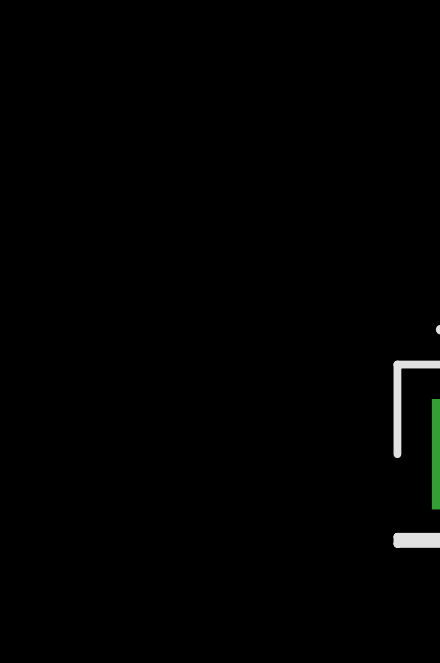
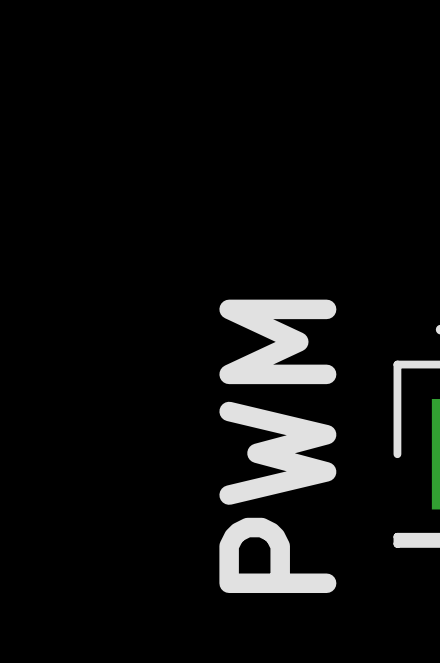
text: none -> PWM (277, 446)

